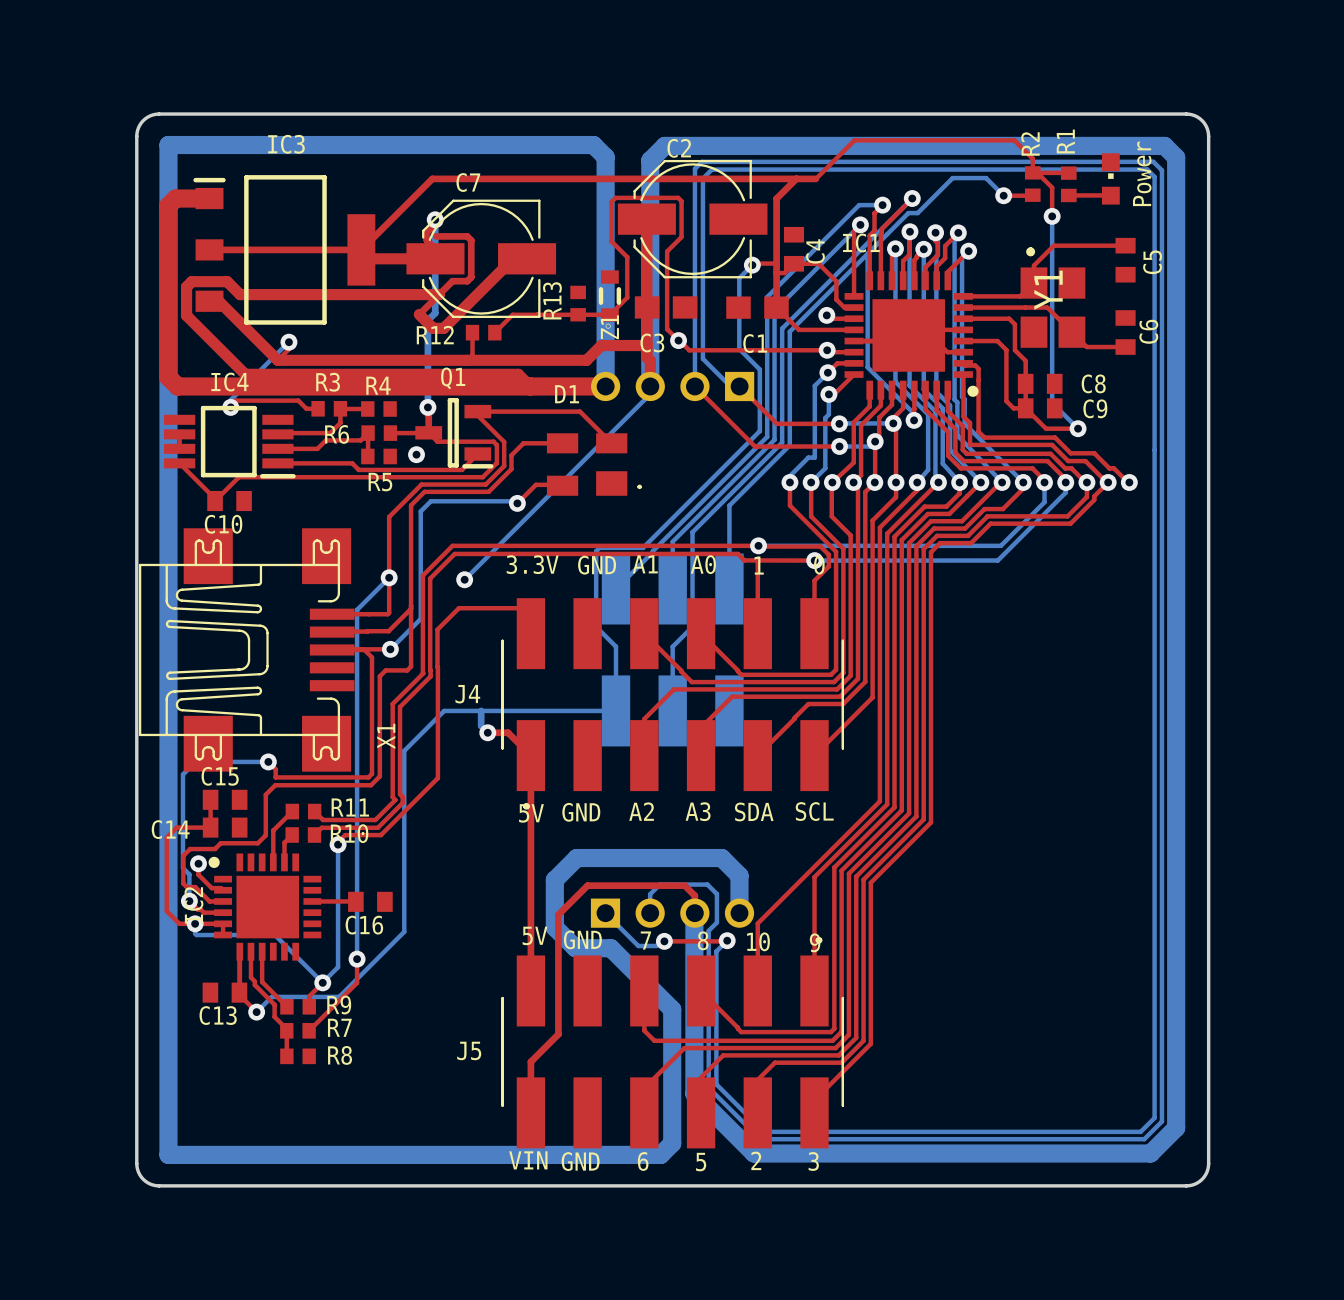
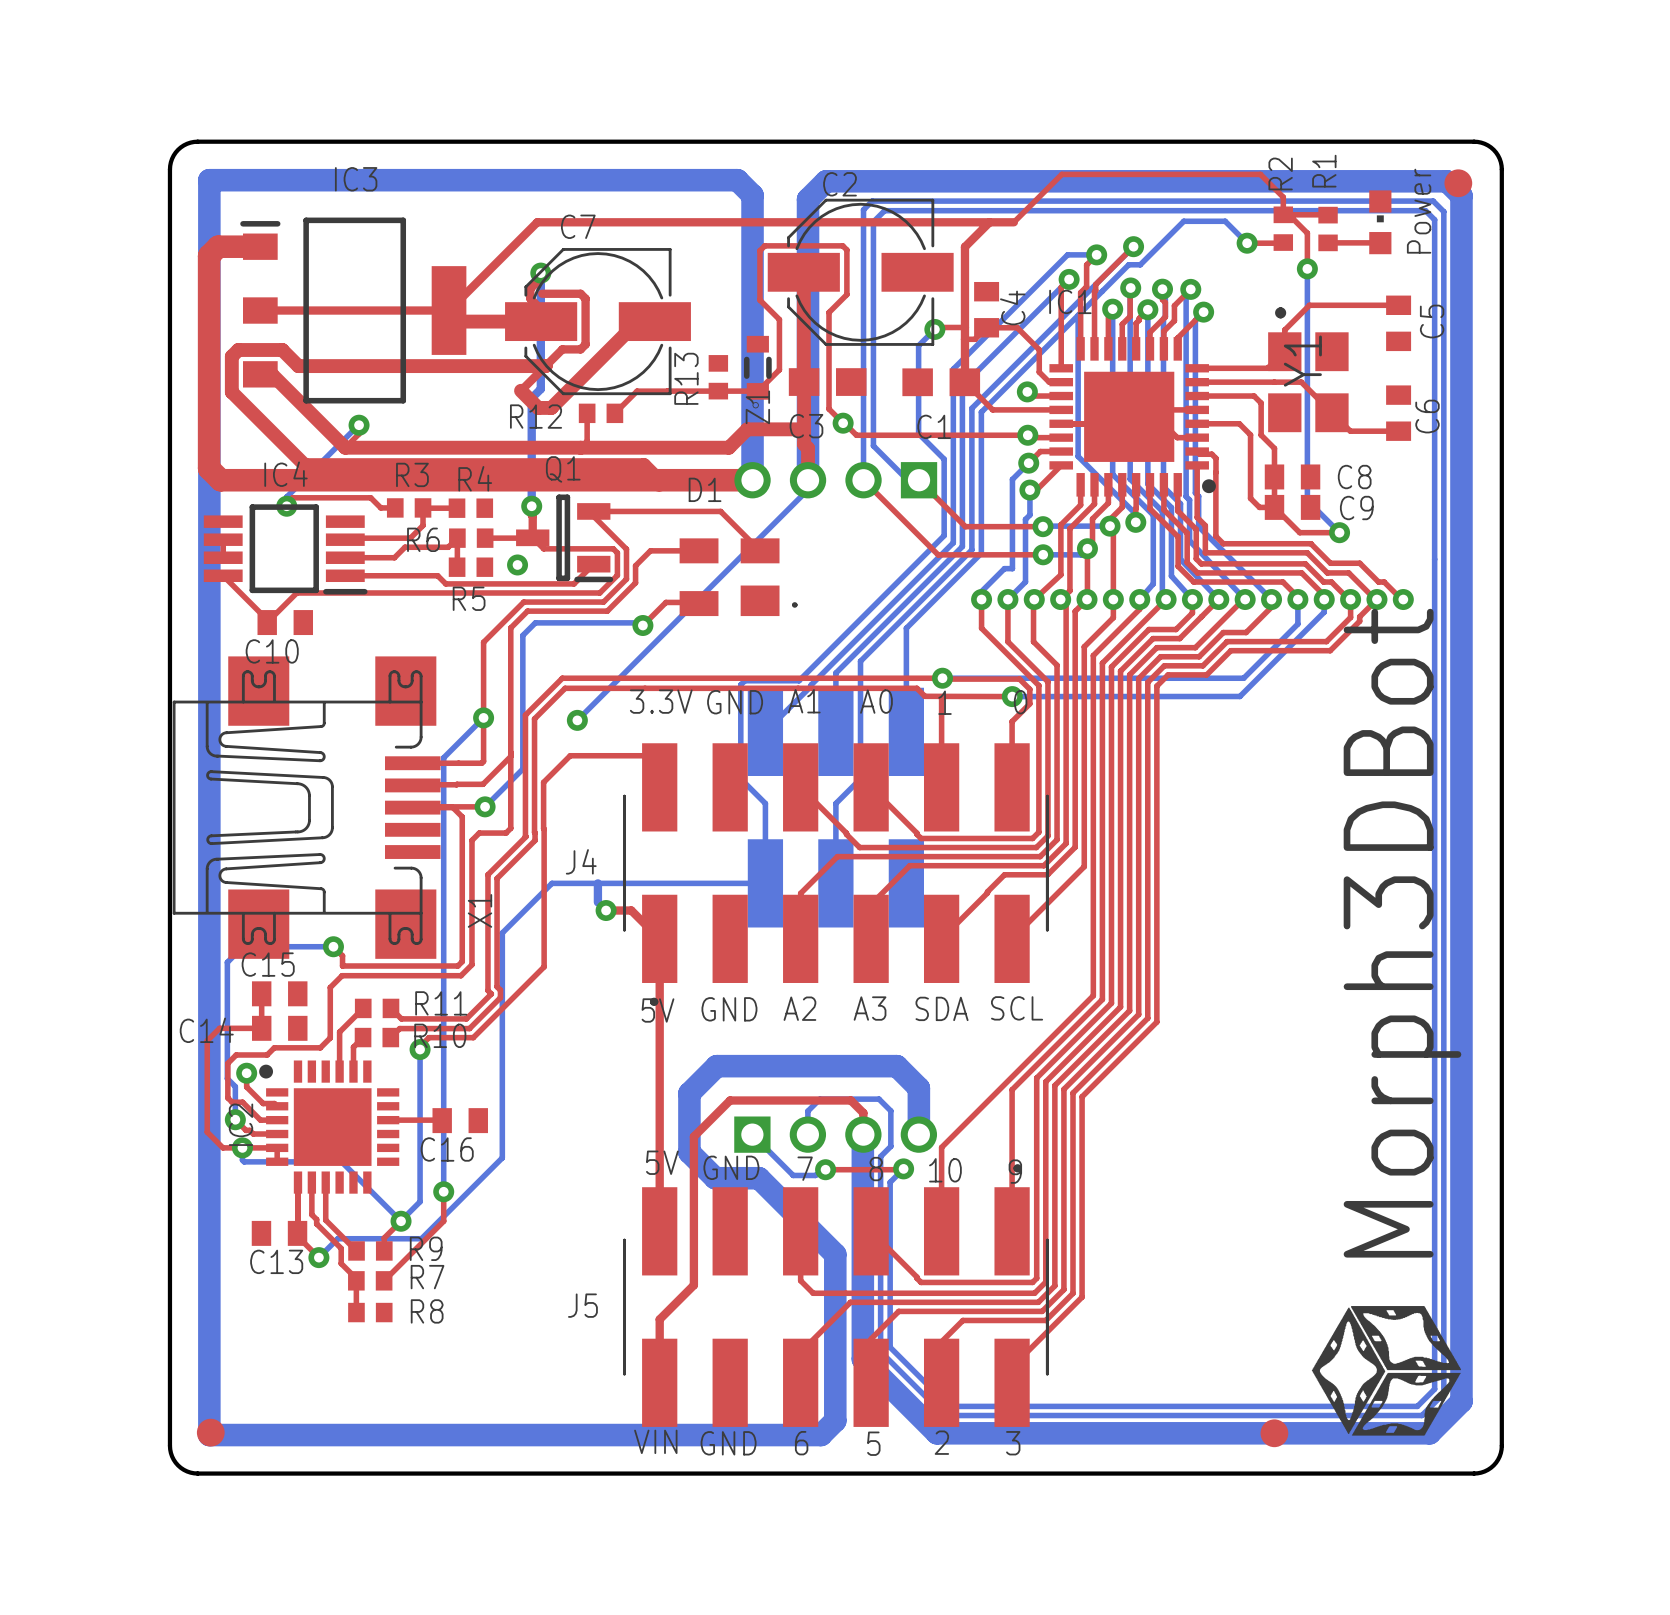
part: none -> (1458, 183)
drawing: none -> [1311, 1306, 1461, 1436]
part: none -> (210, 1432)
part: none -> (1274, 1433)

